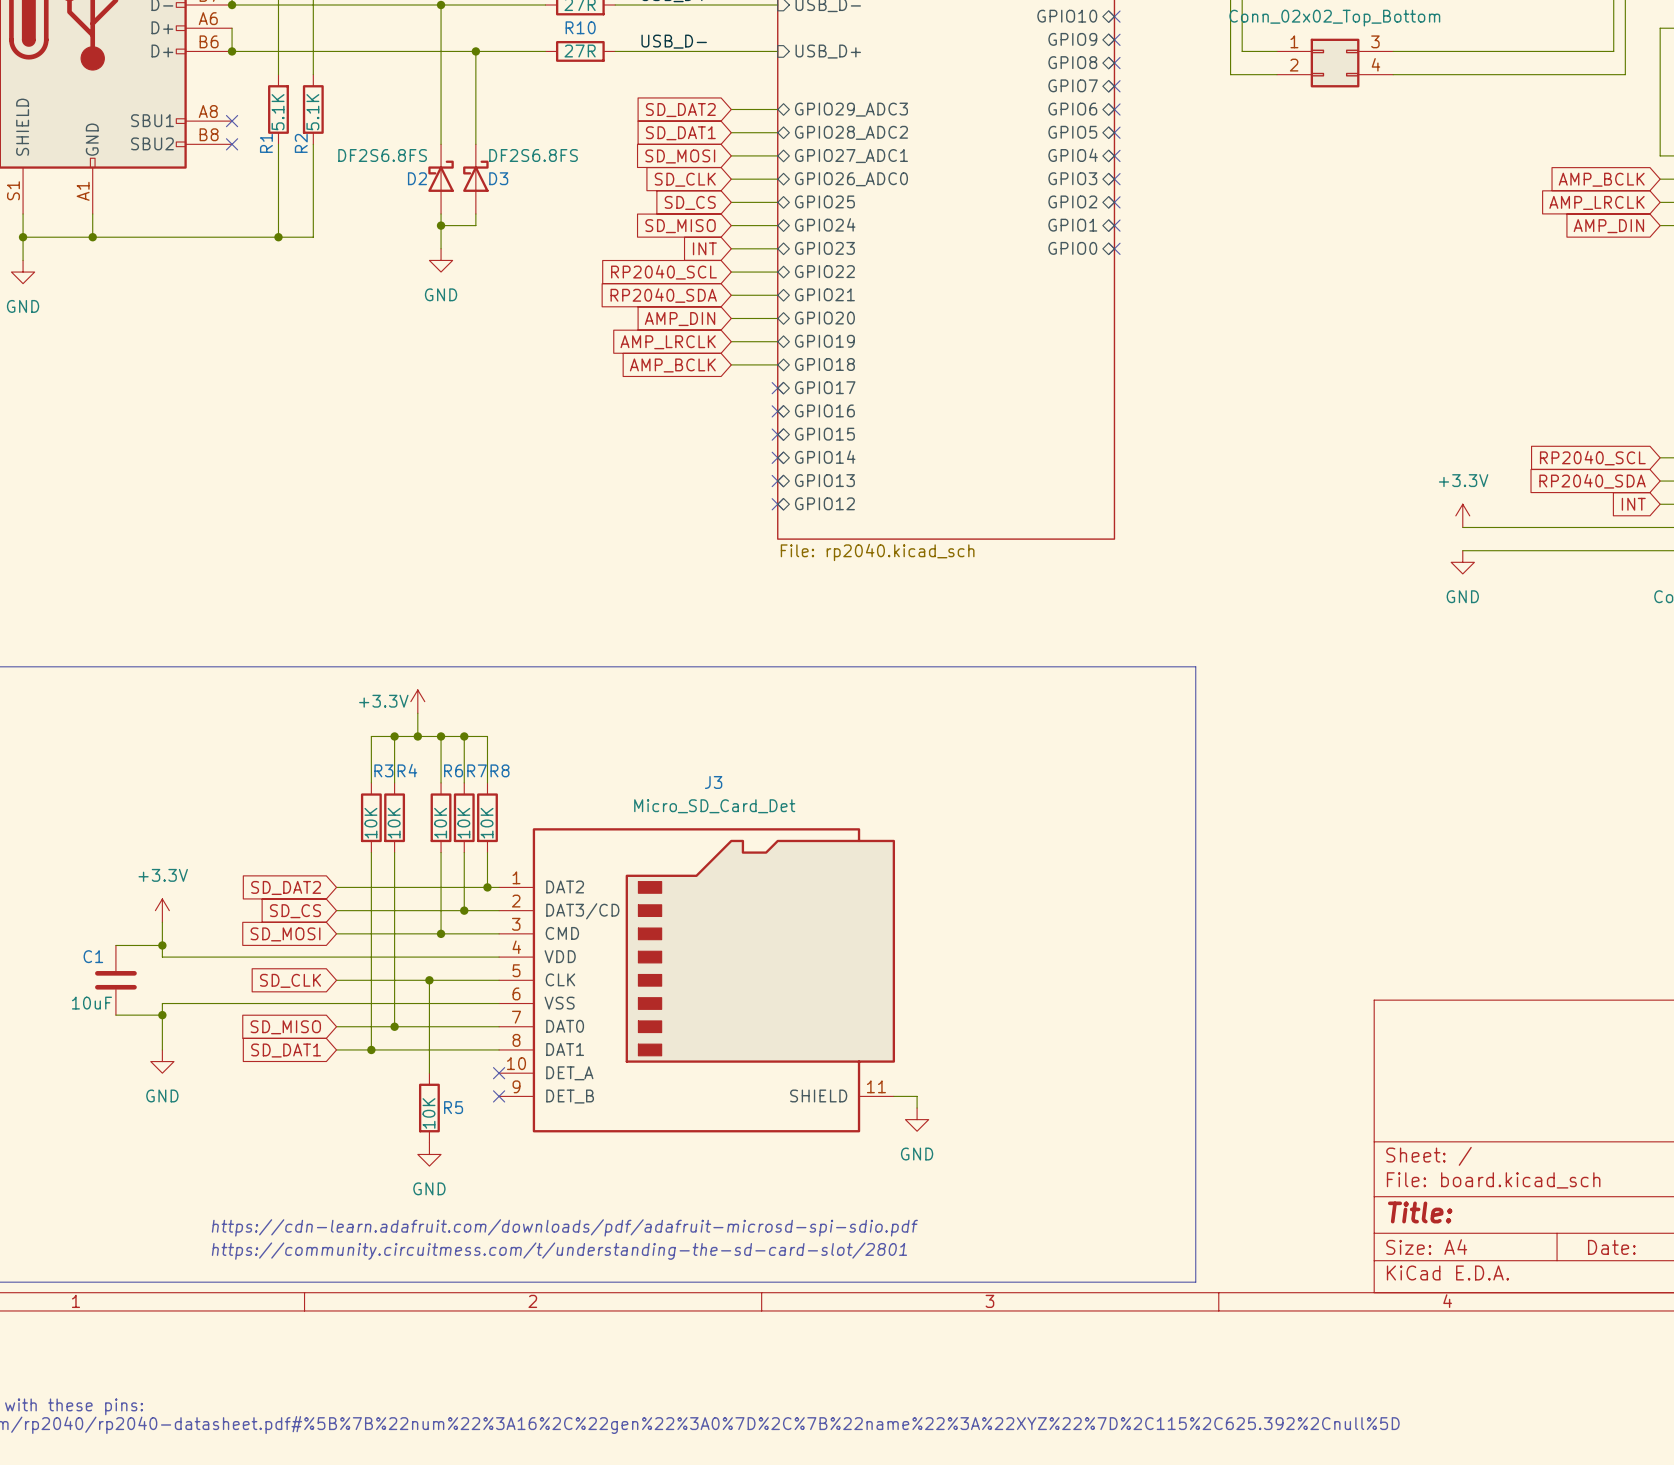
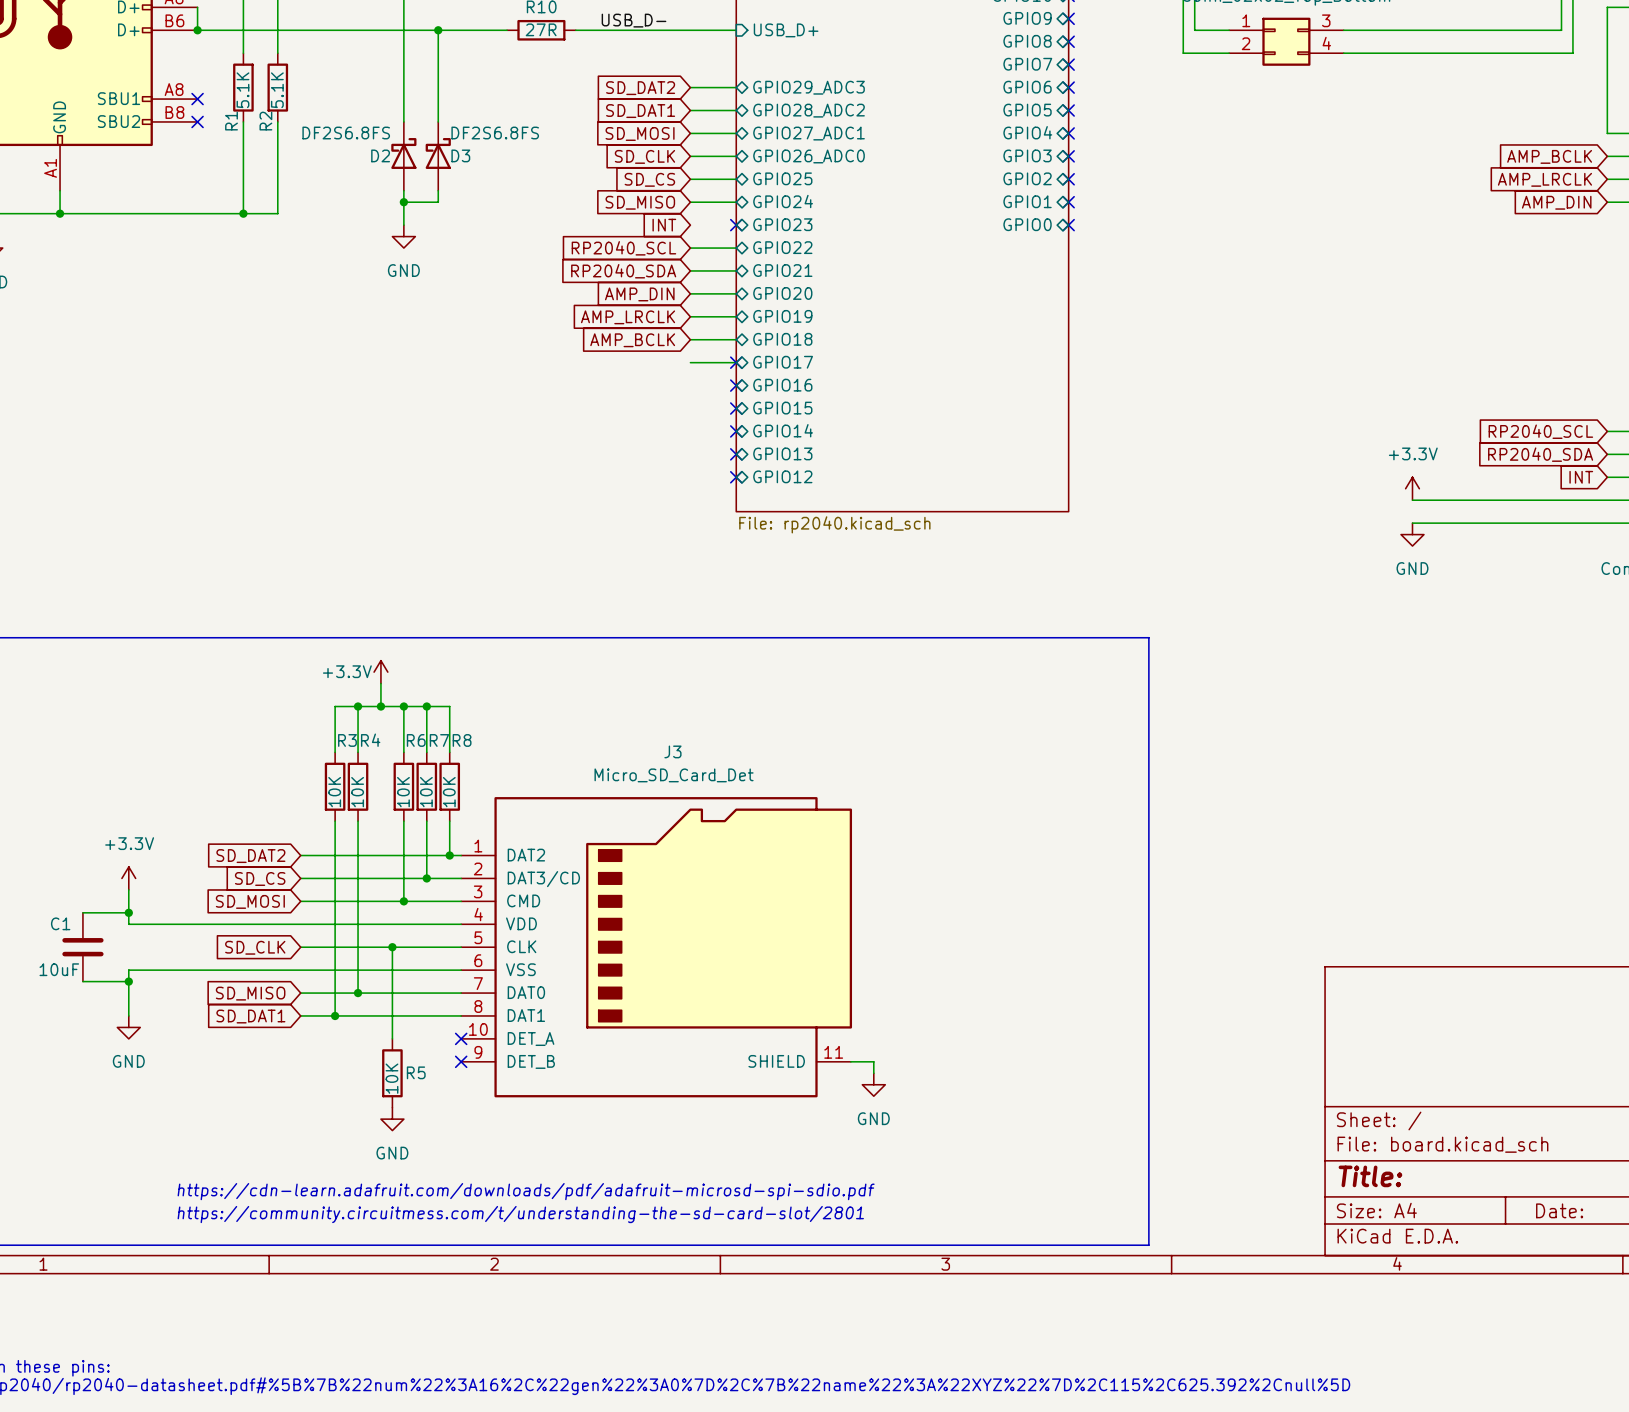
wire: (731, 248) (777, 248) -> (690, 362) (736, 362)
no-connect mark: none -> (736, 225)

